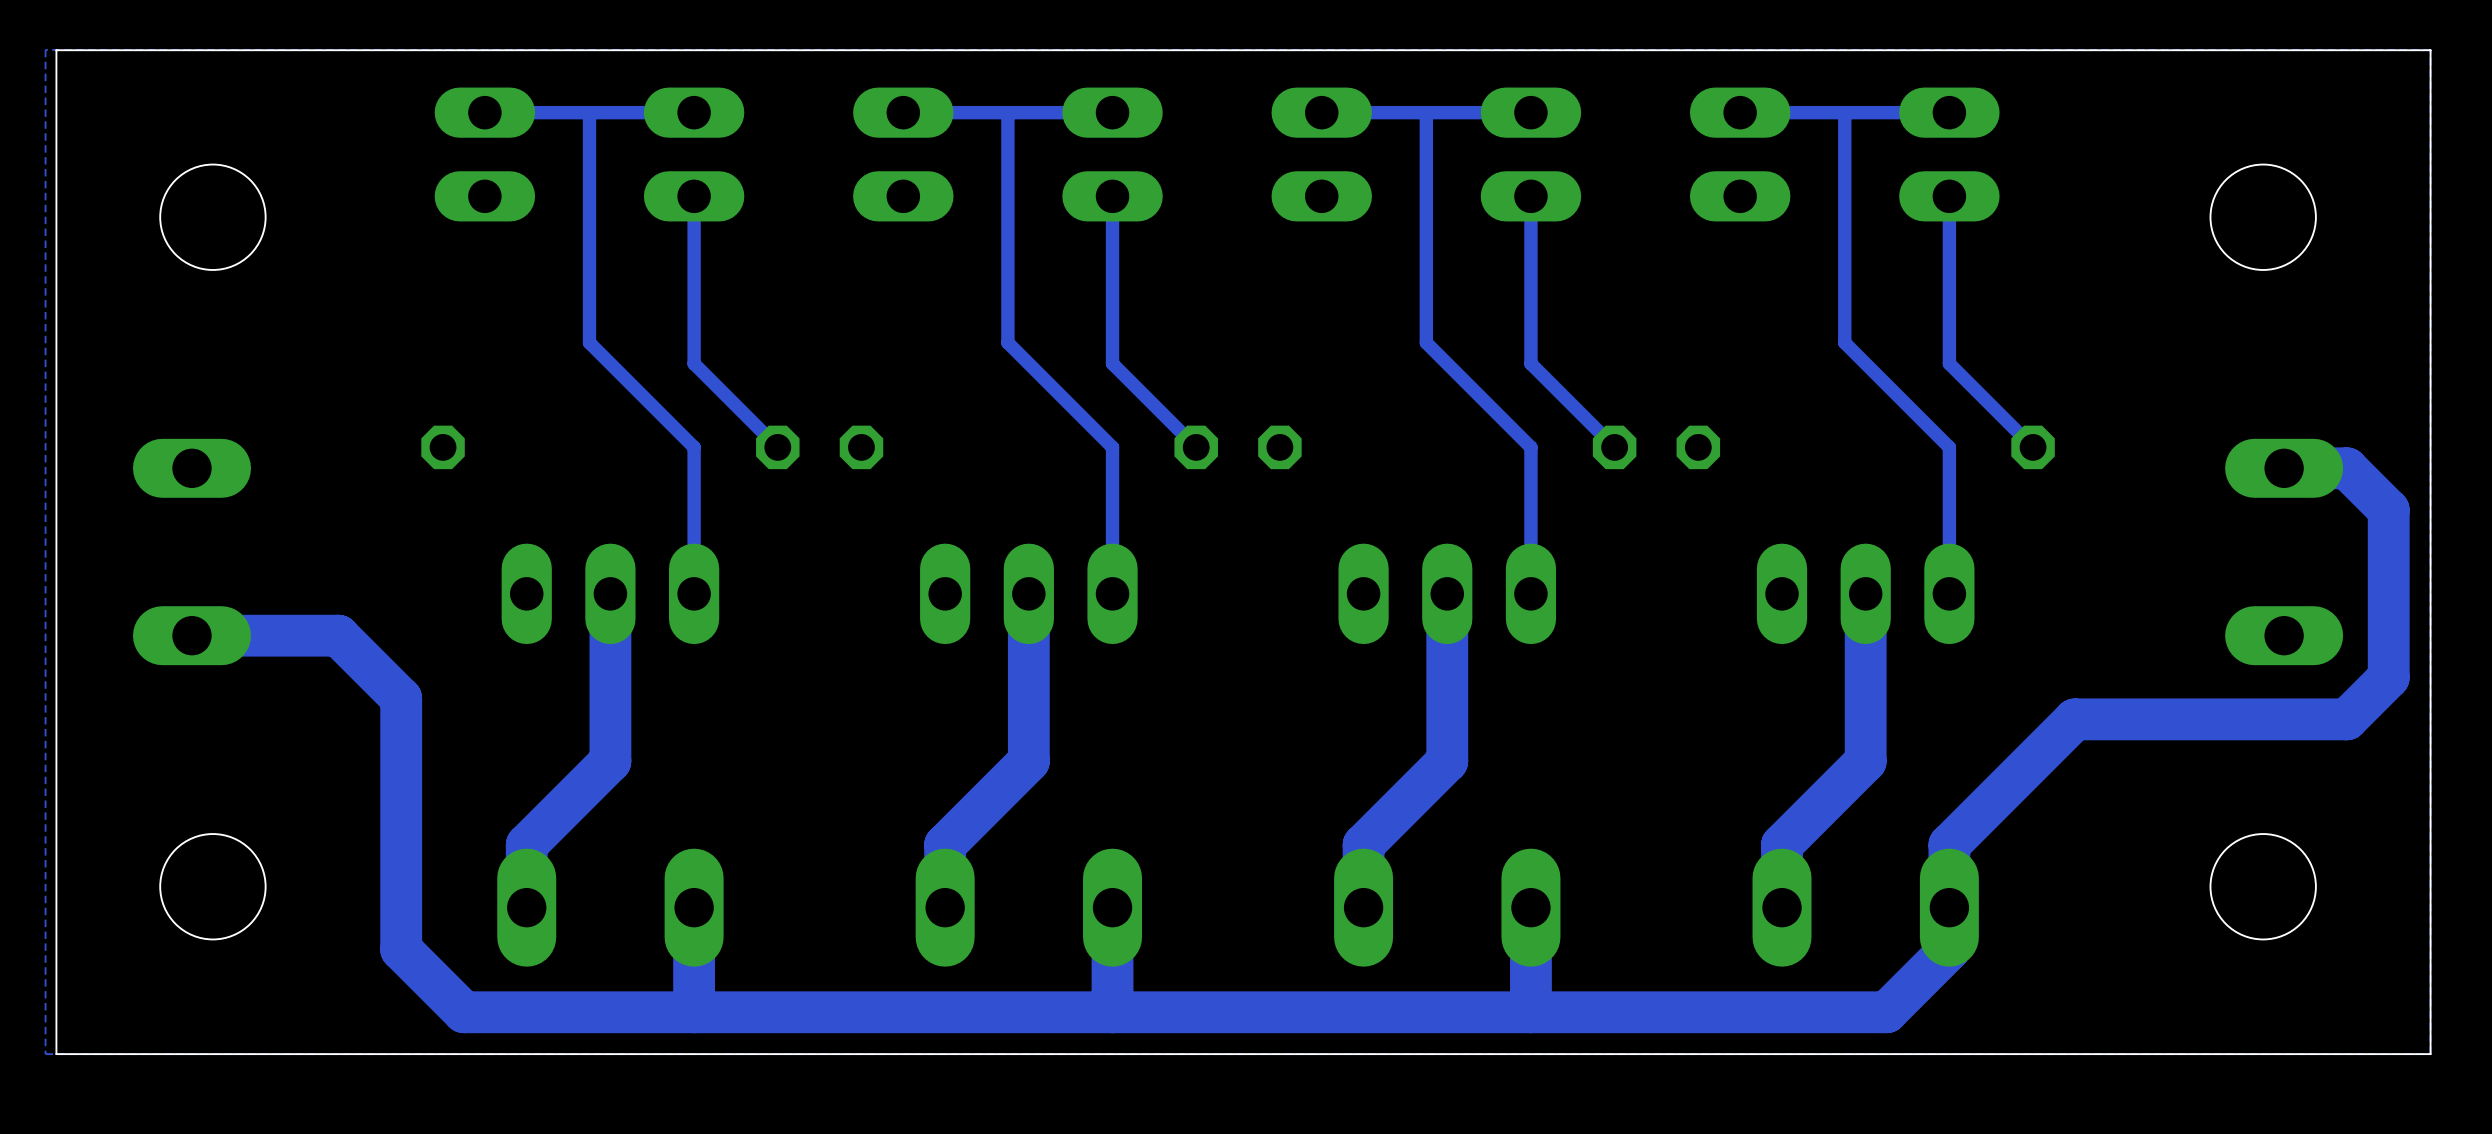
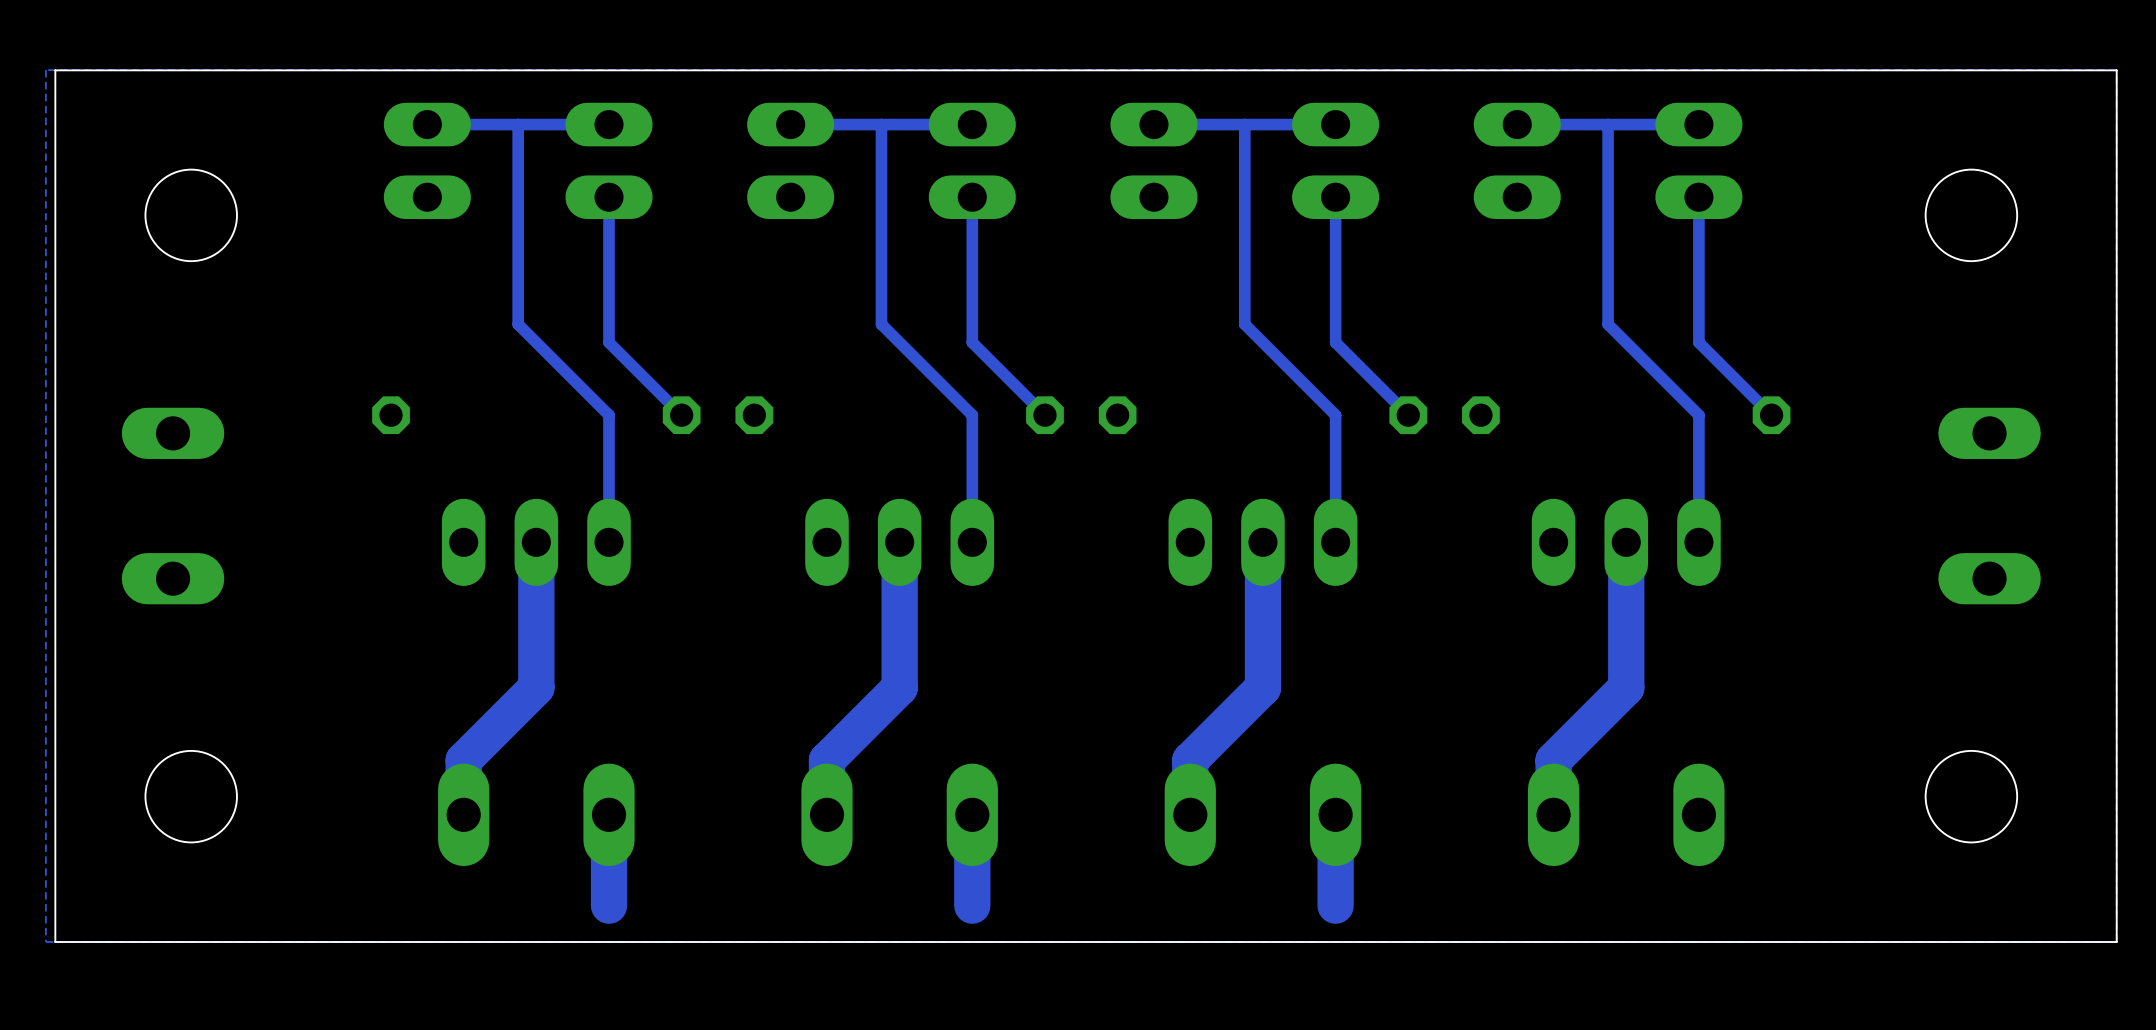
track: (2284, 468) (2346, 468) (2388, 510) (2388, 677) (2346, 719) (2074, 719) (1949, 844) (1949, 949) (1886, 1012) (463, 1012) (401, 949) (401, 698) (338, 635) (191, 635) -> none

